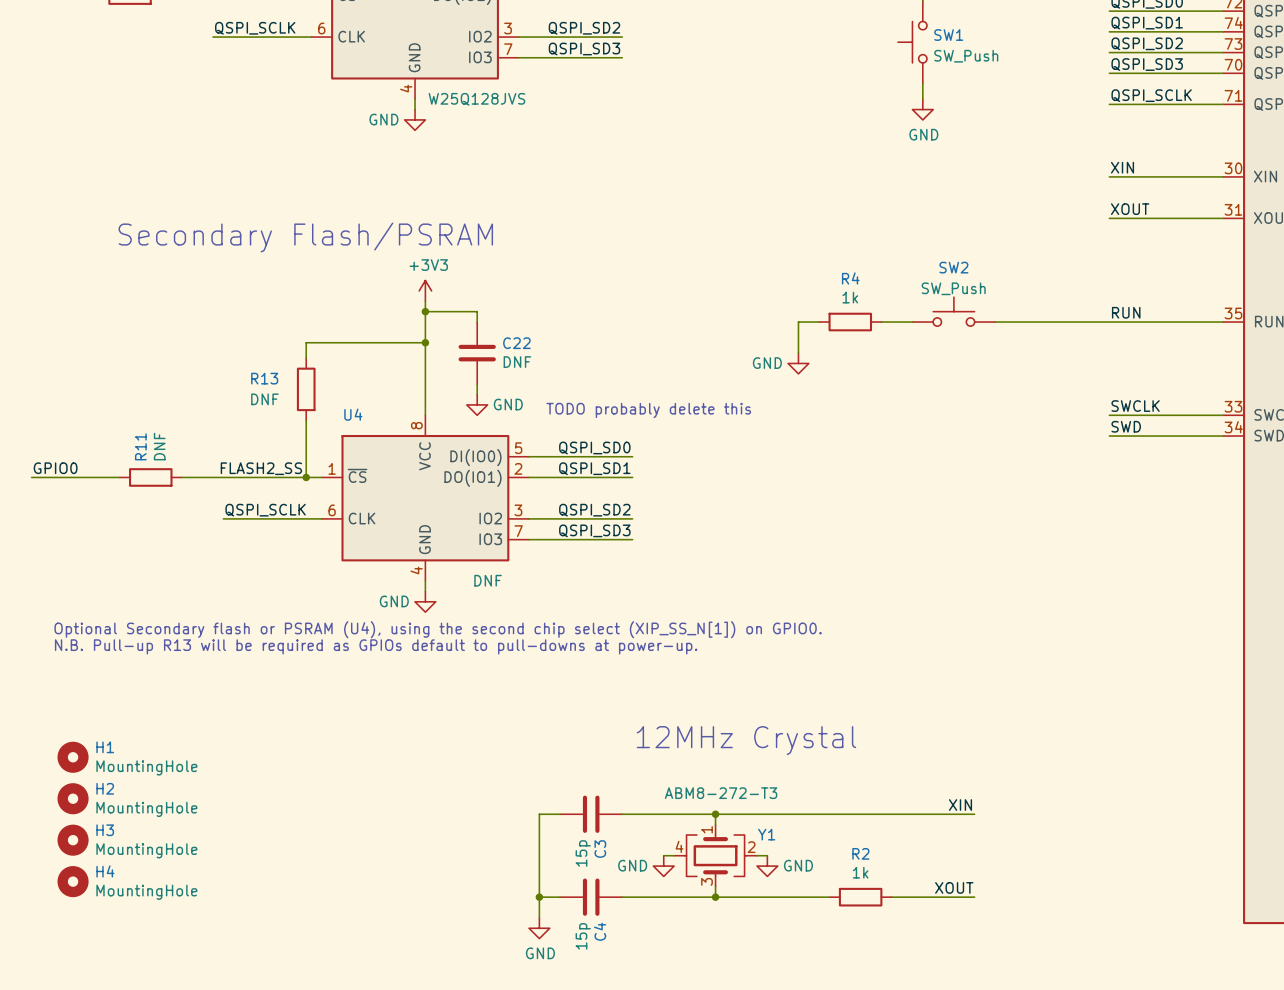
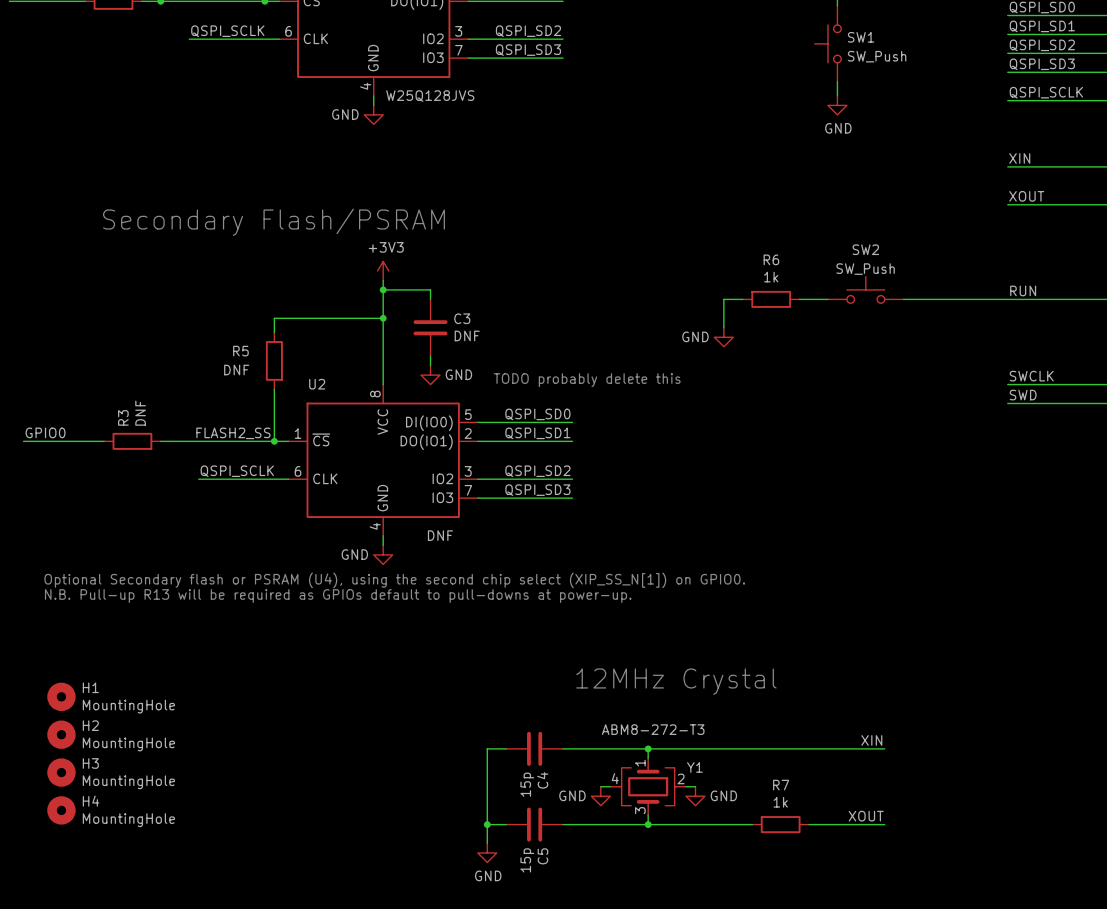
R4 name: R4 (850, 278) -> R6 (771, 259)
C22 name: C22 (516, 343) -> C3 (462, 318)
R13 name: R13 (264, 378) -> R5 (240, 351)
U4 name: U4 (353, 414) -> U2 (317, 384)
R11 name: R11 (140, 446) -> R3 (123, 417)
C3 name: C3 (600, 849) -> C4 (542, 780)
R2 name: R2 (860, 853) -> R7 (781, 785)
C4 name: C4 (600, 931) -> C5 (542, 856)

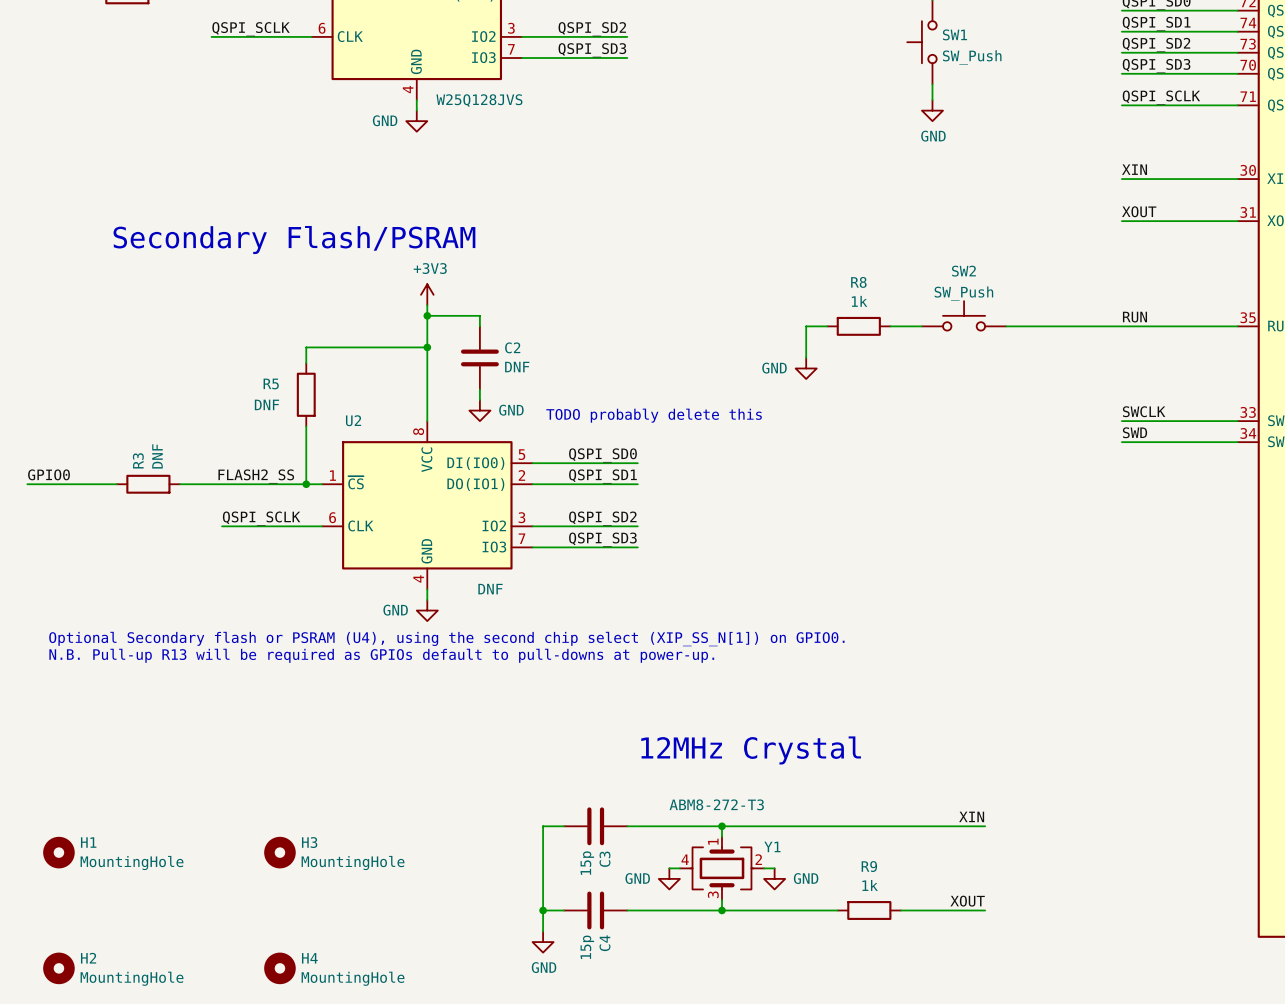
R6 name: R6 (771, 259) -> R8 (858, 282)
C3 name: C3 (462, 318) -> C2 (512, 347)
H1 position: (61, 696) -> (58, 852)
H2 position: (61, 734) -> (58, 968)
H3 position: (61, 772) -> (279, 852)
C4 name: C4 (542, 780) -> C3 (604, 859)
R7 name: R7 (781, 785) -> R9 (869, 866)
H4 position: (61, 810) -> (279, 968)
C5 name: C5 (542, 856) -> C4 (604, 943)

